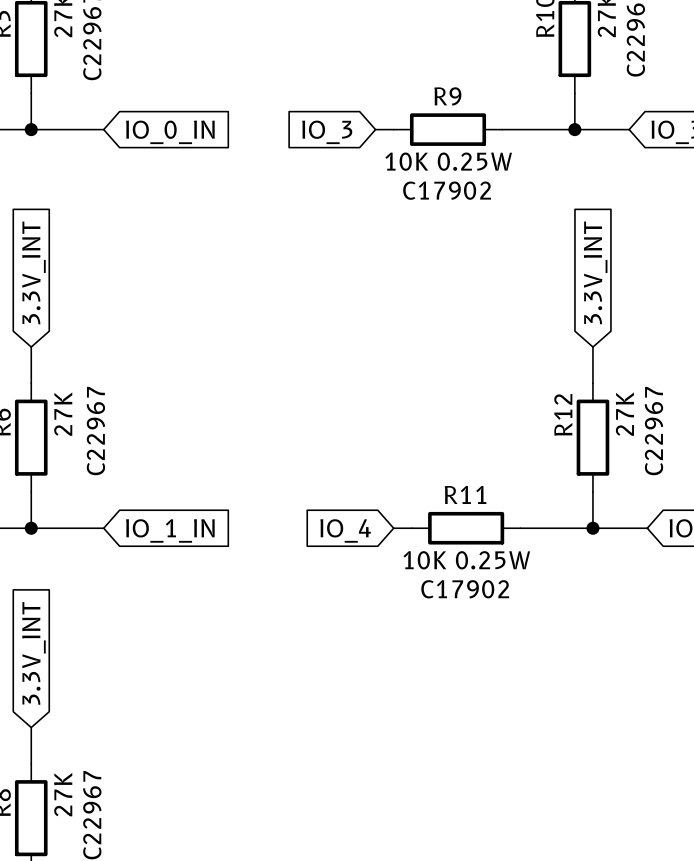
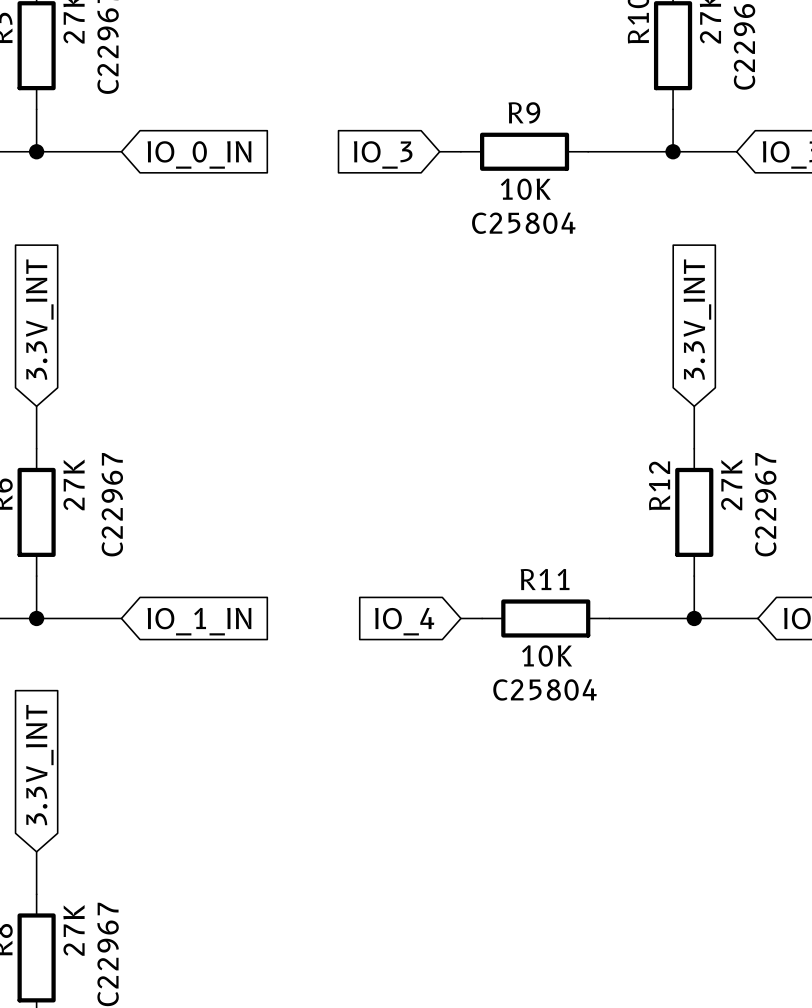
R9 value: 10K 0.25W (448, 161) -> 10K (525, 189)
R9 text: C17902 (447, 190) -> C25804 (523, 223)
R11 value: 10K 0.25W (466, 560) -> 10K (547, 656)
R11 text: C17902 (465, 589) -> C25804 (544, 689)

